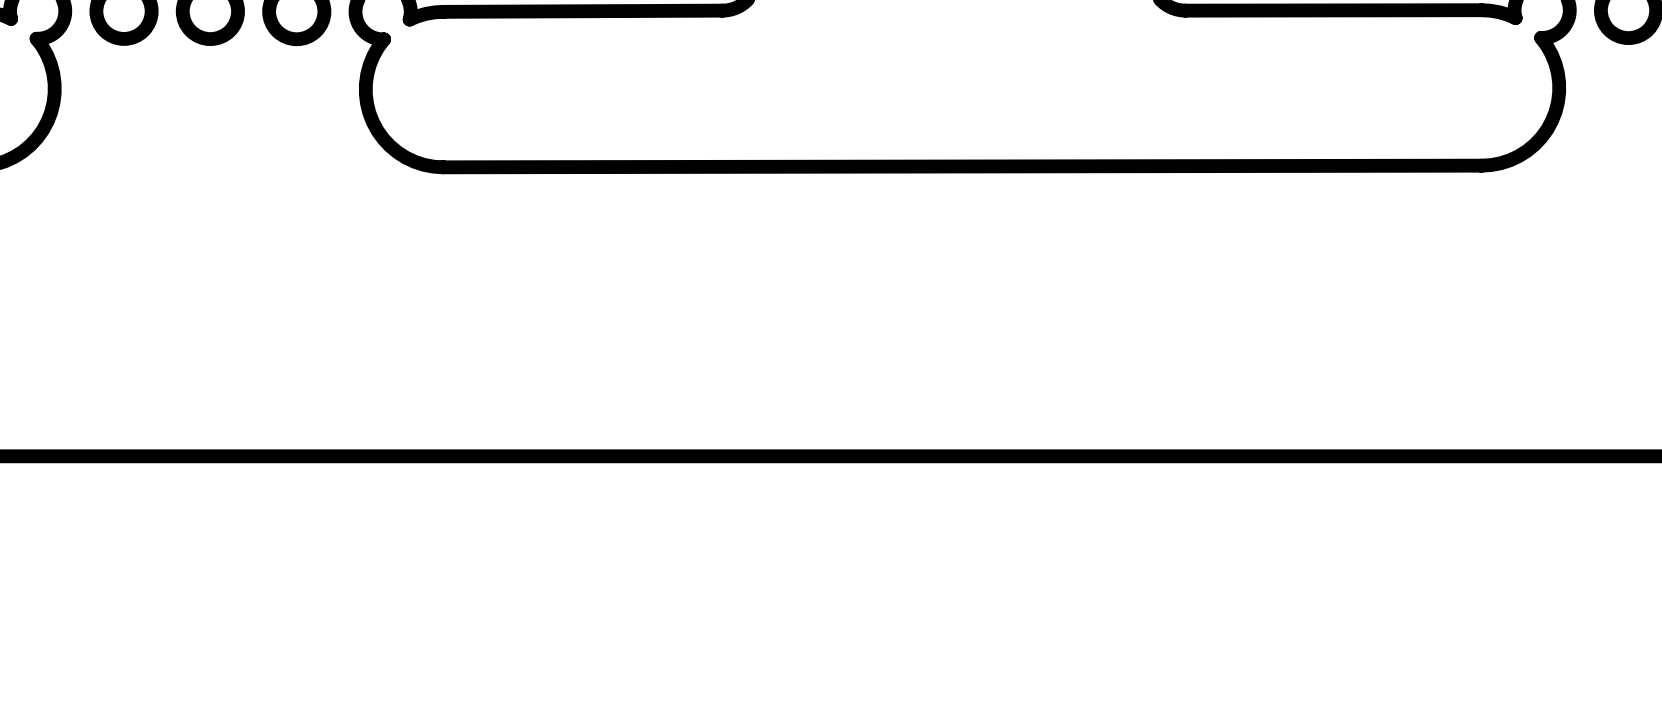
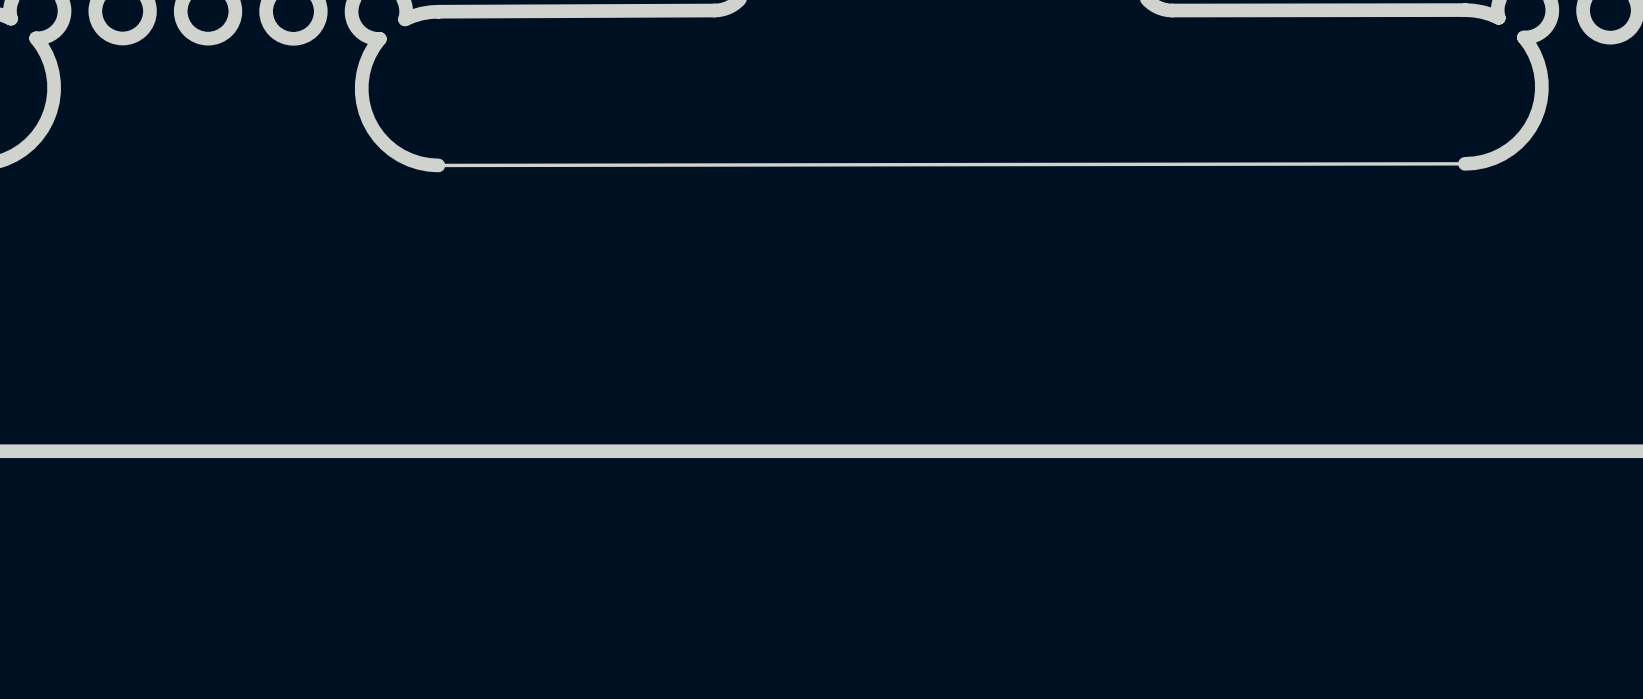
board edge width: thick (1481, 165) (443, 167) -> thin (1464, 163) (438, 165)

